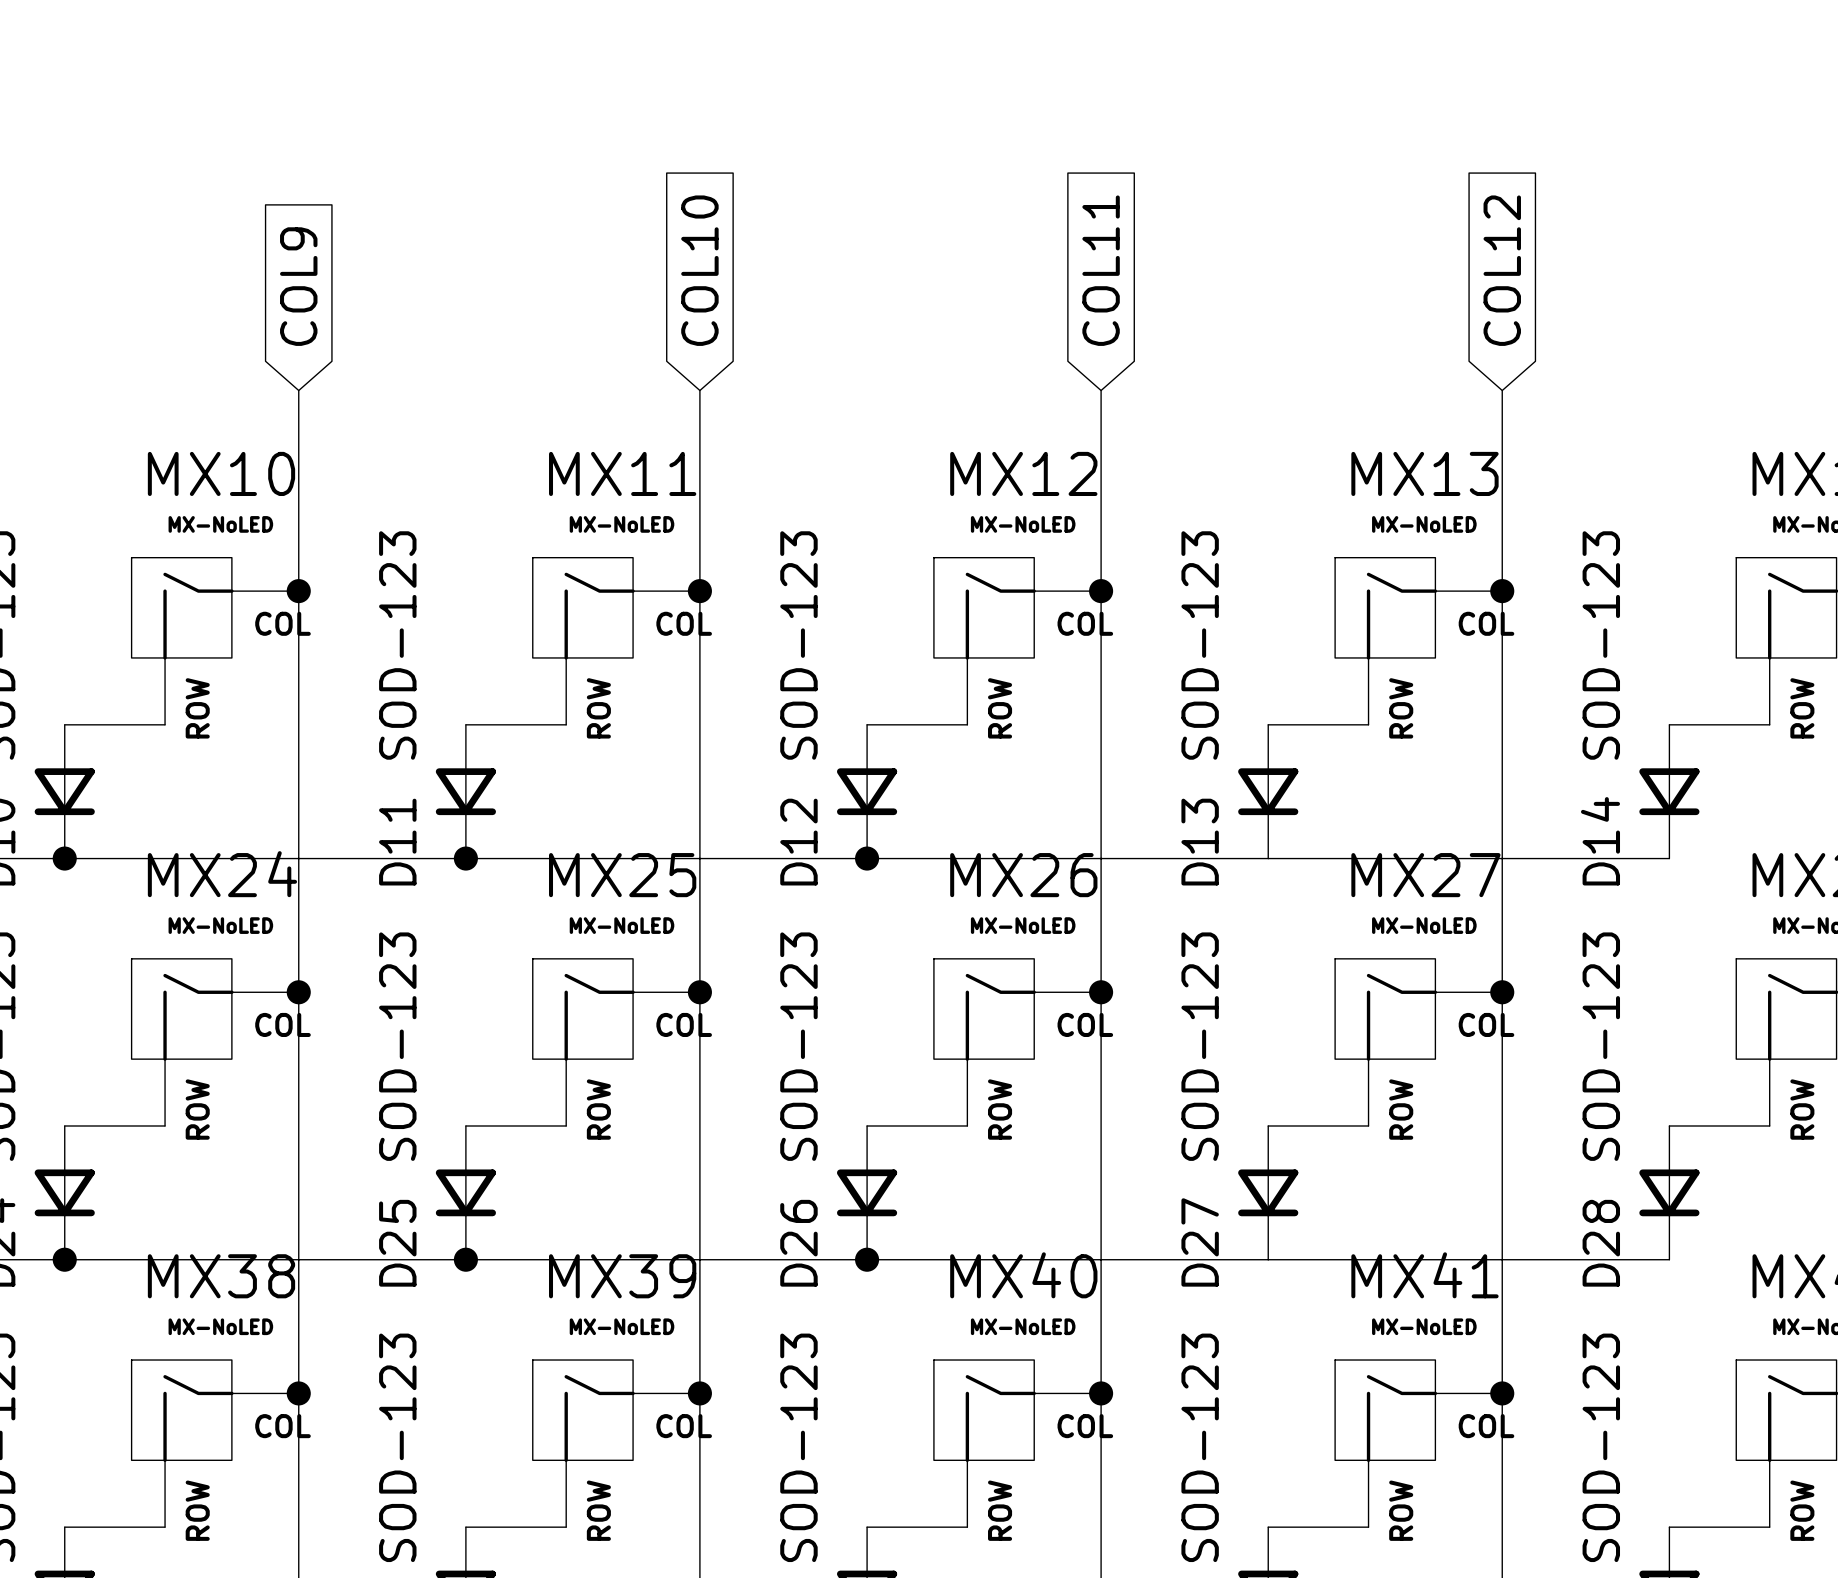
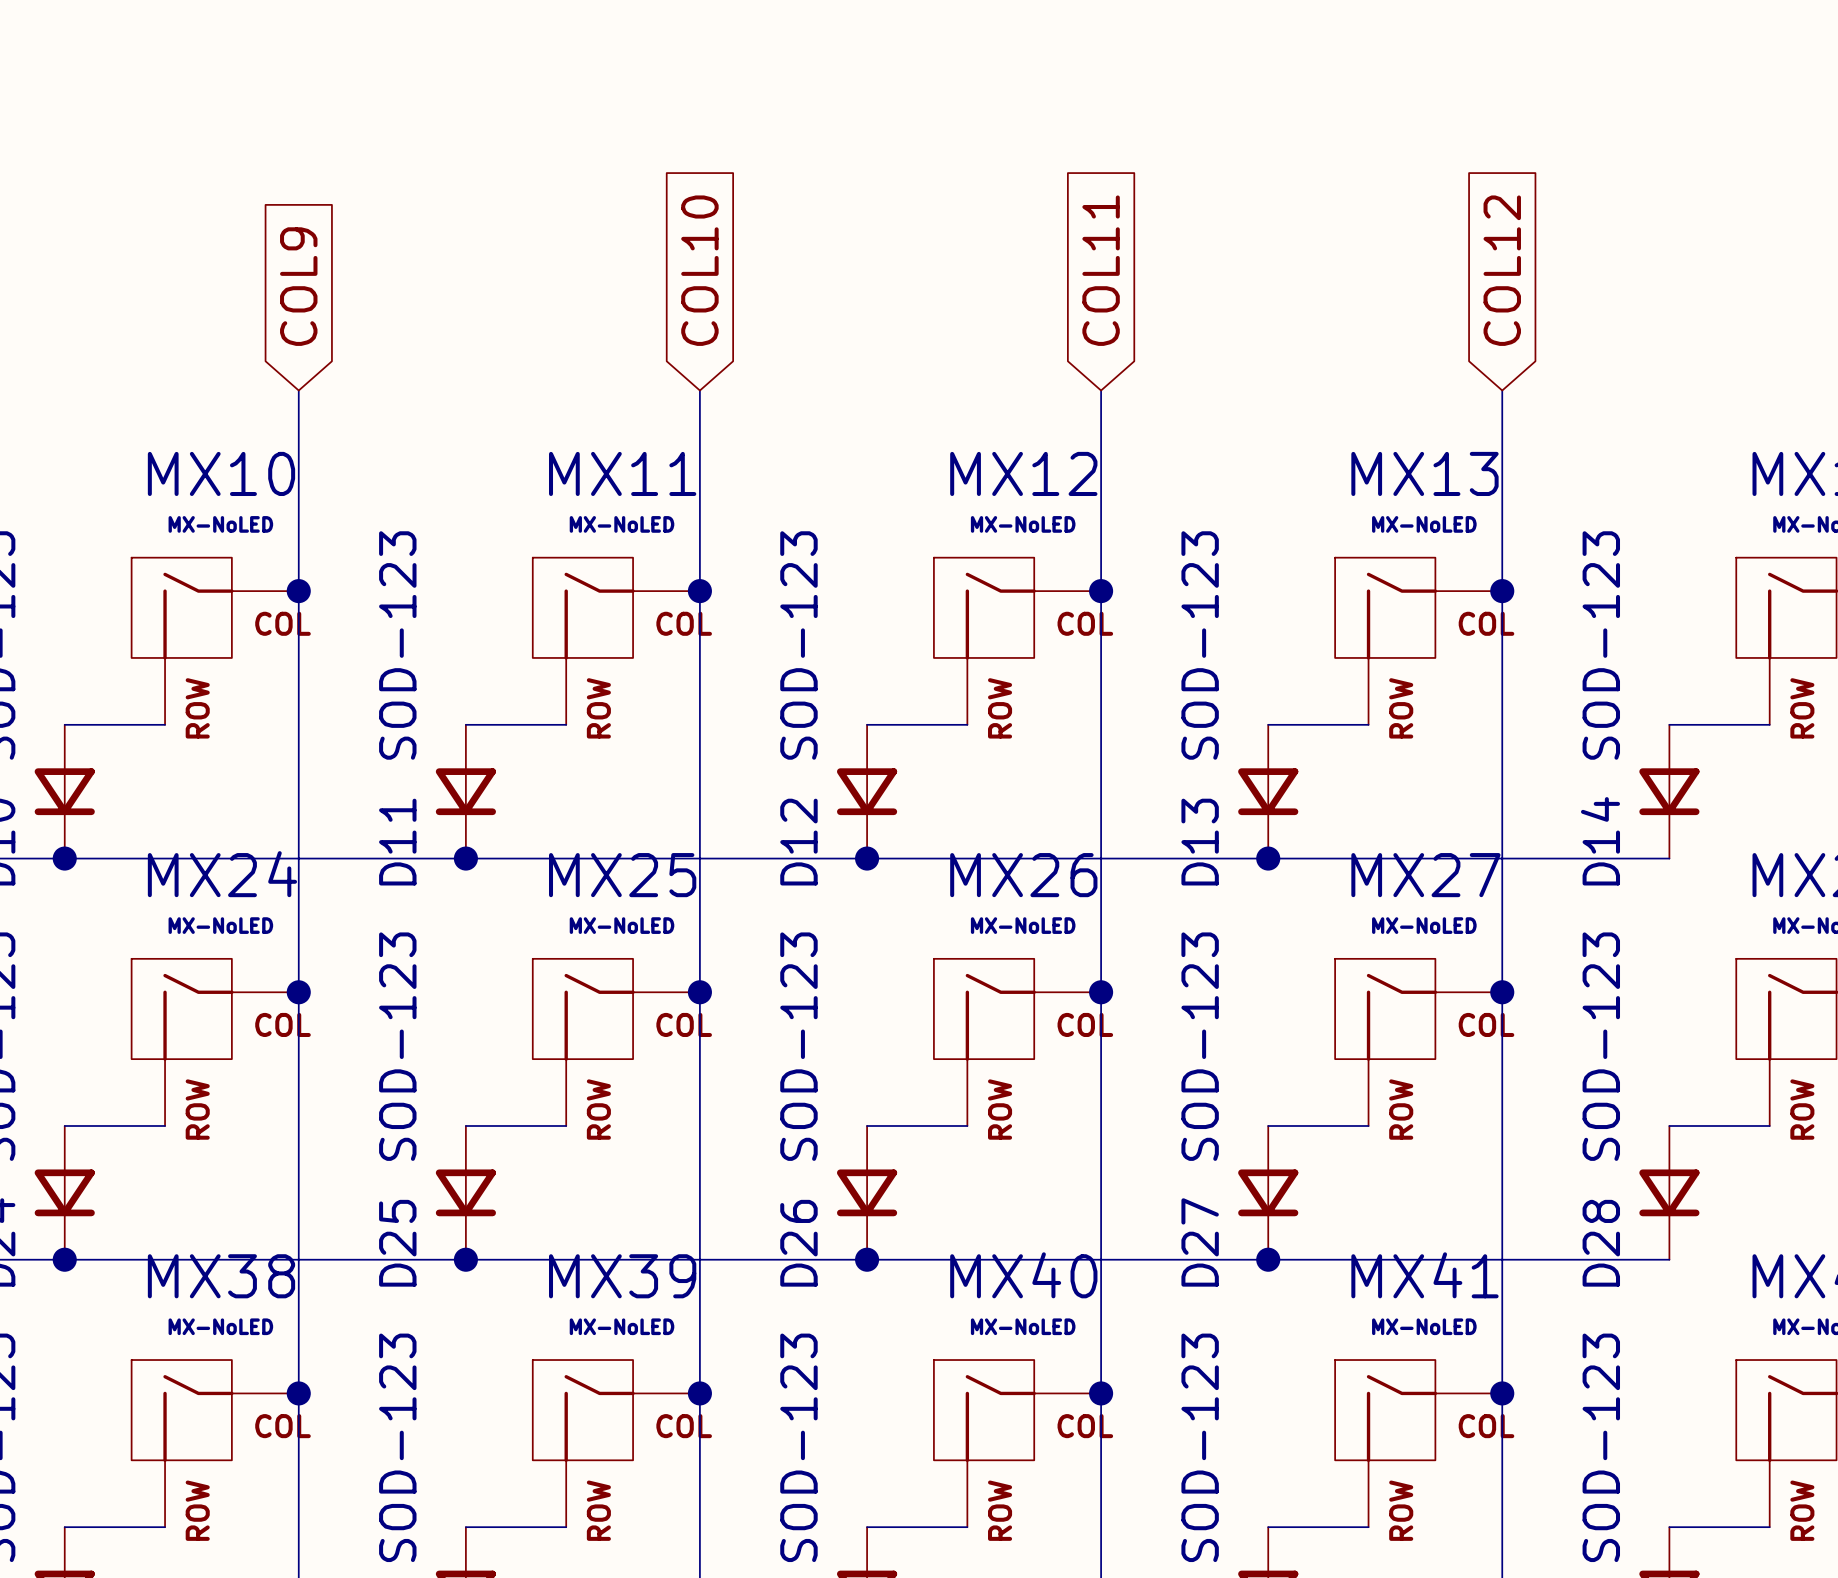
junction: none -> (1268, 858)
junction: none -> (1268, 1259)

